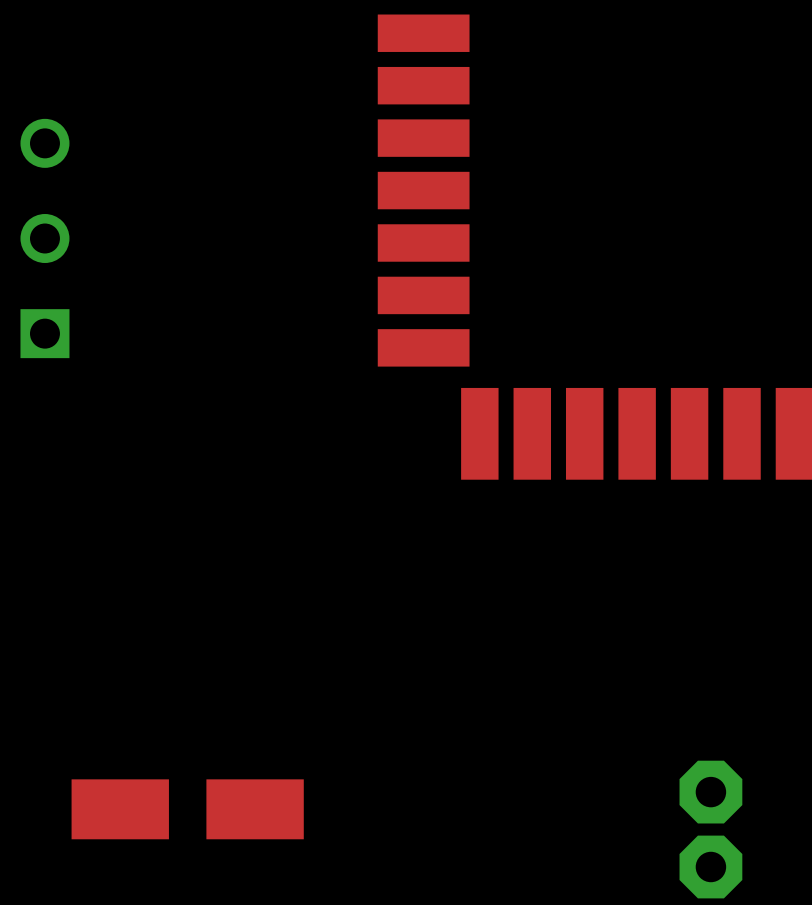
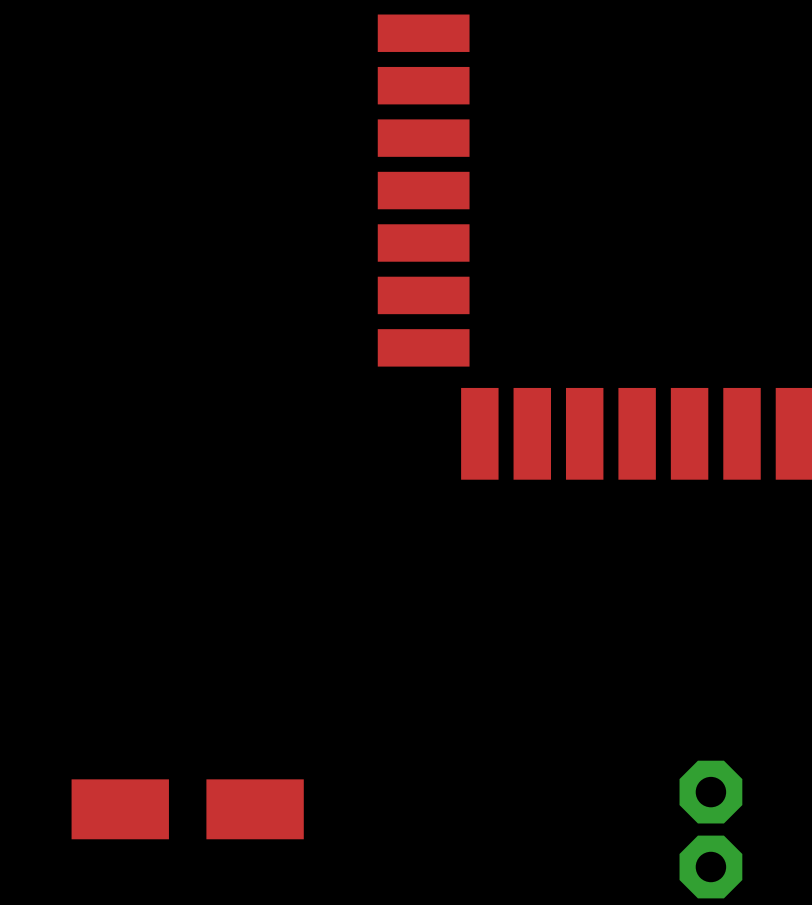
part: (44, 238) -> none

